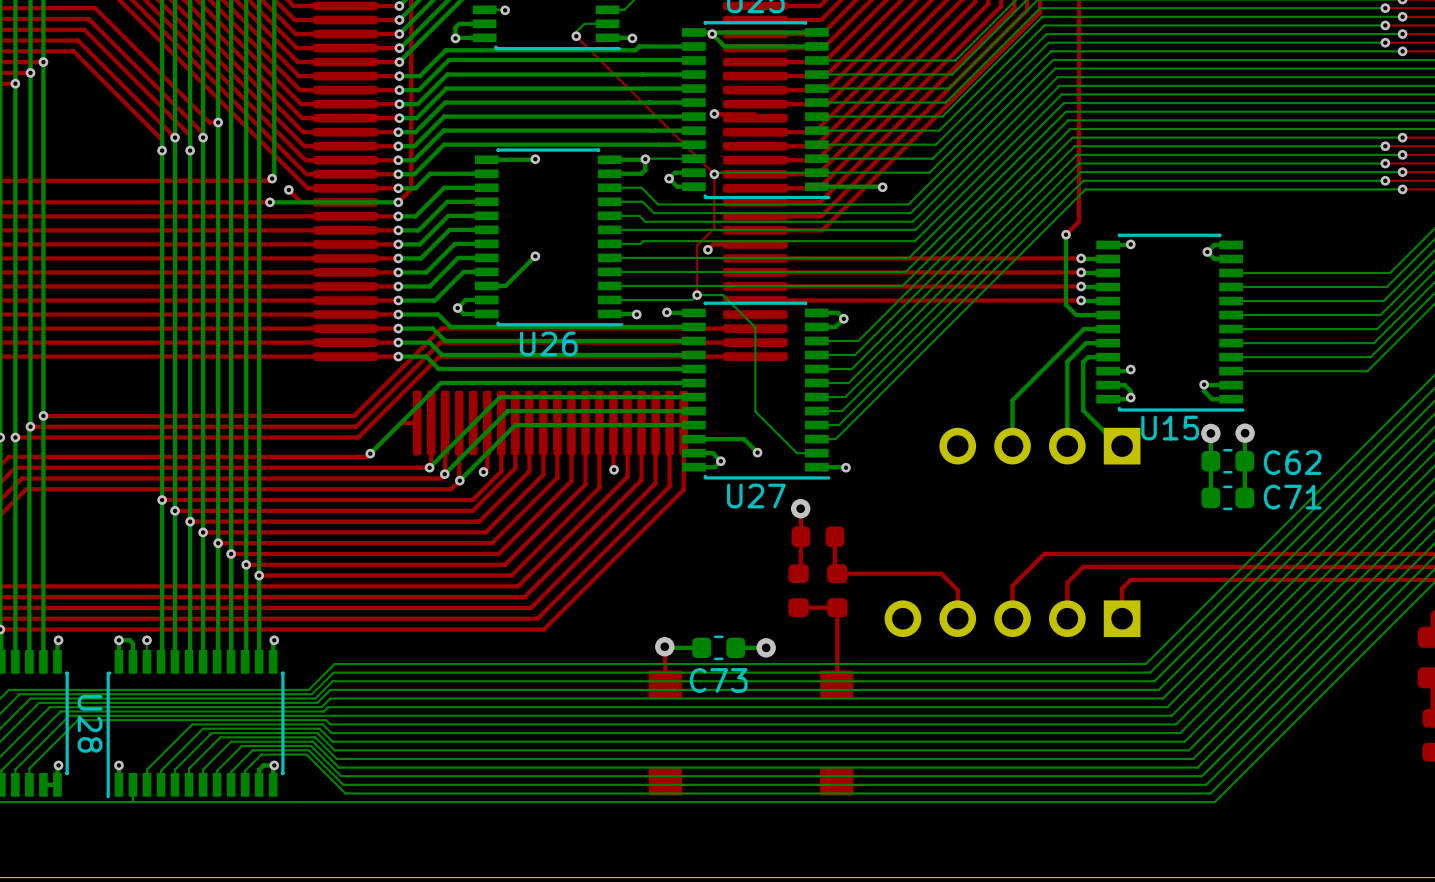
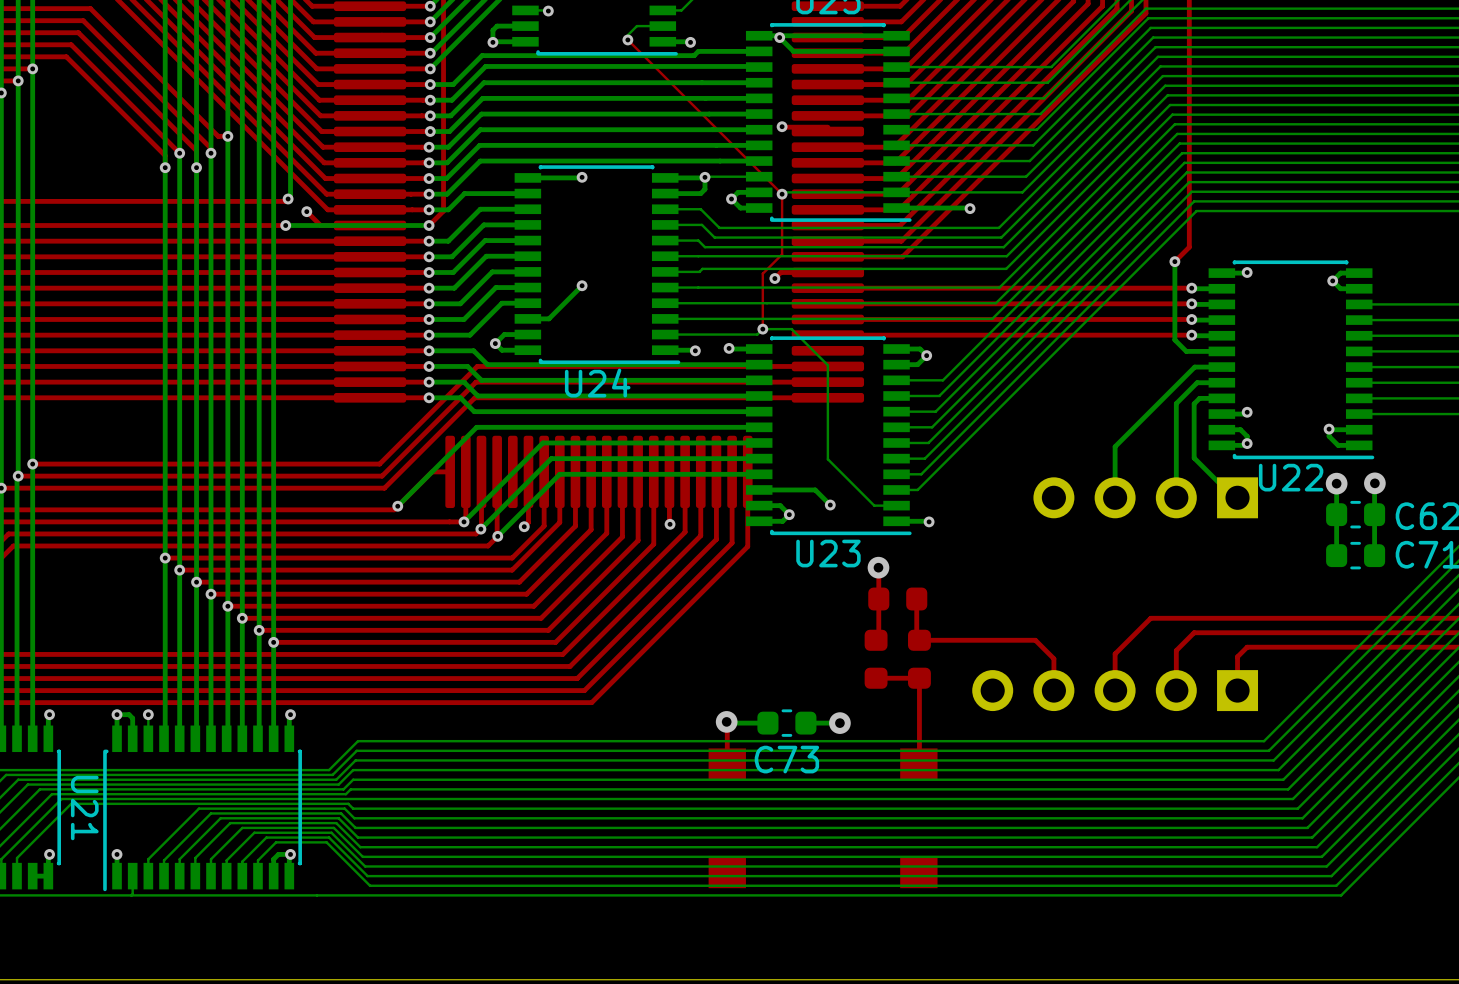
U26 name: U26 (548, 343) -> U24 (597, 383)
U15 name: U15 (1170, 428) -> U22 (1291, 477)
U27 name: U27 (756, 496) -> U23 (828, 553)
U28 name: U28 (90, 723) -> U21 (84, 808)

